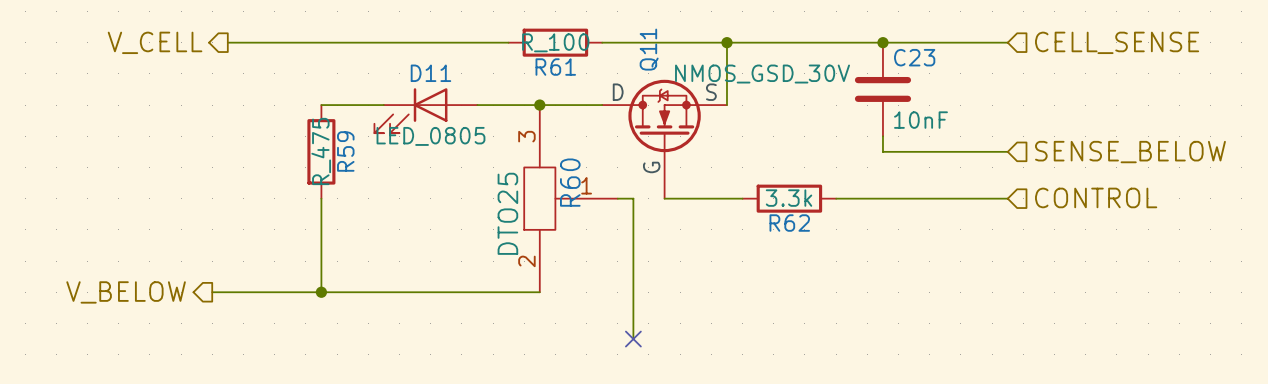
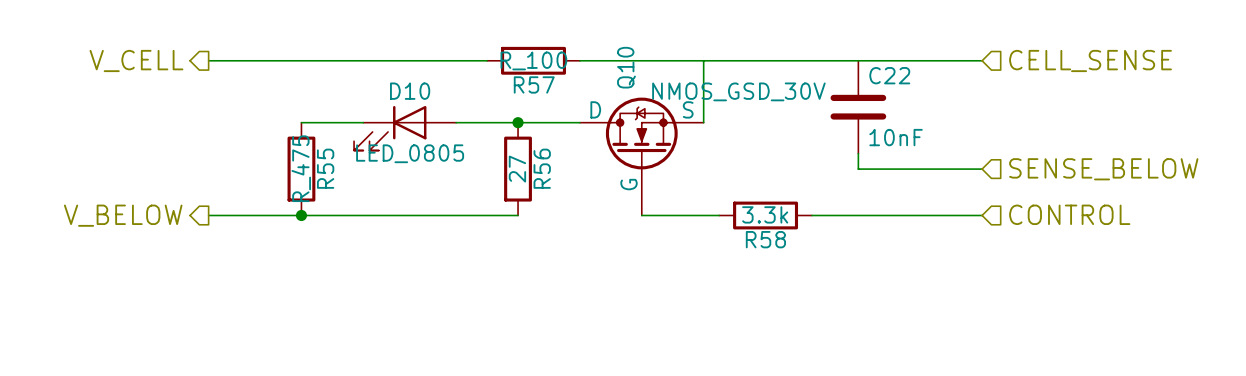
junction: (726, 42) -> none
junction: (882, 42) -> none
Q11 name: Q11 (649, 49) -> Q10 (626, 67)
C23 name: C23 (914, 57) -> C22 (889, 75)
R61 name: R61 (555, 67) -> R57 (534, 84)
D11 name: D11 (430, 73) -> D10 (410, 91)
R59 name: R59 (345, 151) -> R55 (325, 168)
R56: none -> 27 (518, 169)
wire: none -> (208, 215) (518, 215)
wire: (321, 198) (321, 292) -> none
junction: none -> (301, 215)
R60: DTO25 (571, 198) -> none
wire: (617, 198) (633, 198) (633, 339) -> none
R62 name: R62 (789, 223) -> R58 (765, 239)
hierarchical label position: V_BELOW (126, 292) -> V_BELOW (123, 215)
wire: (212, 292) (539, 292) -> none
junction: (321, 292) -> none
no-connect mark: (633, 339) -> none

